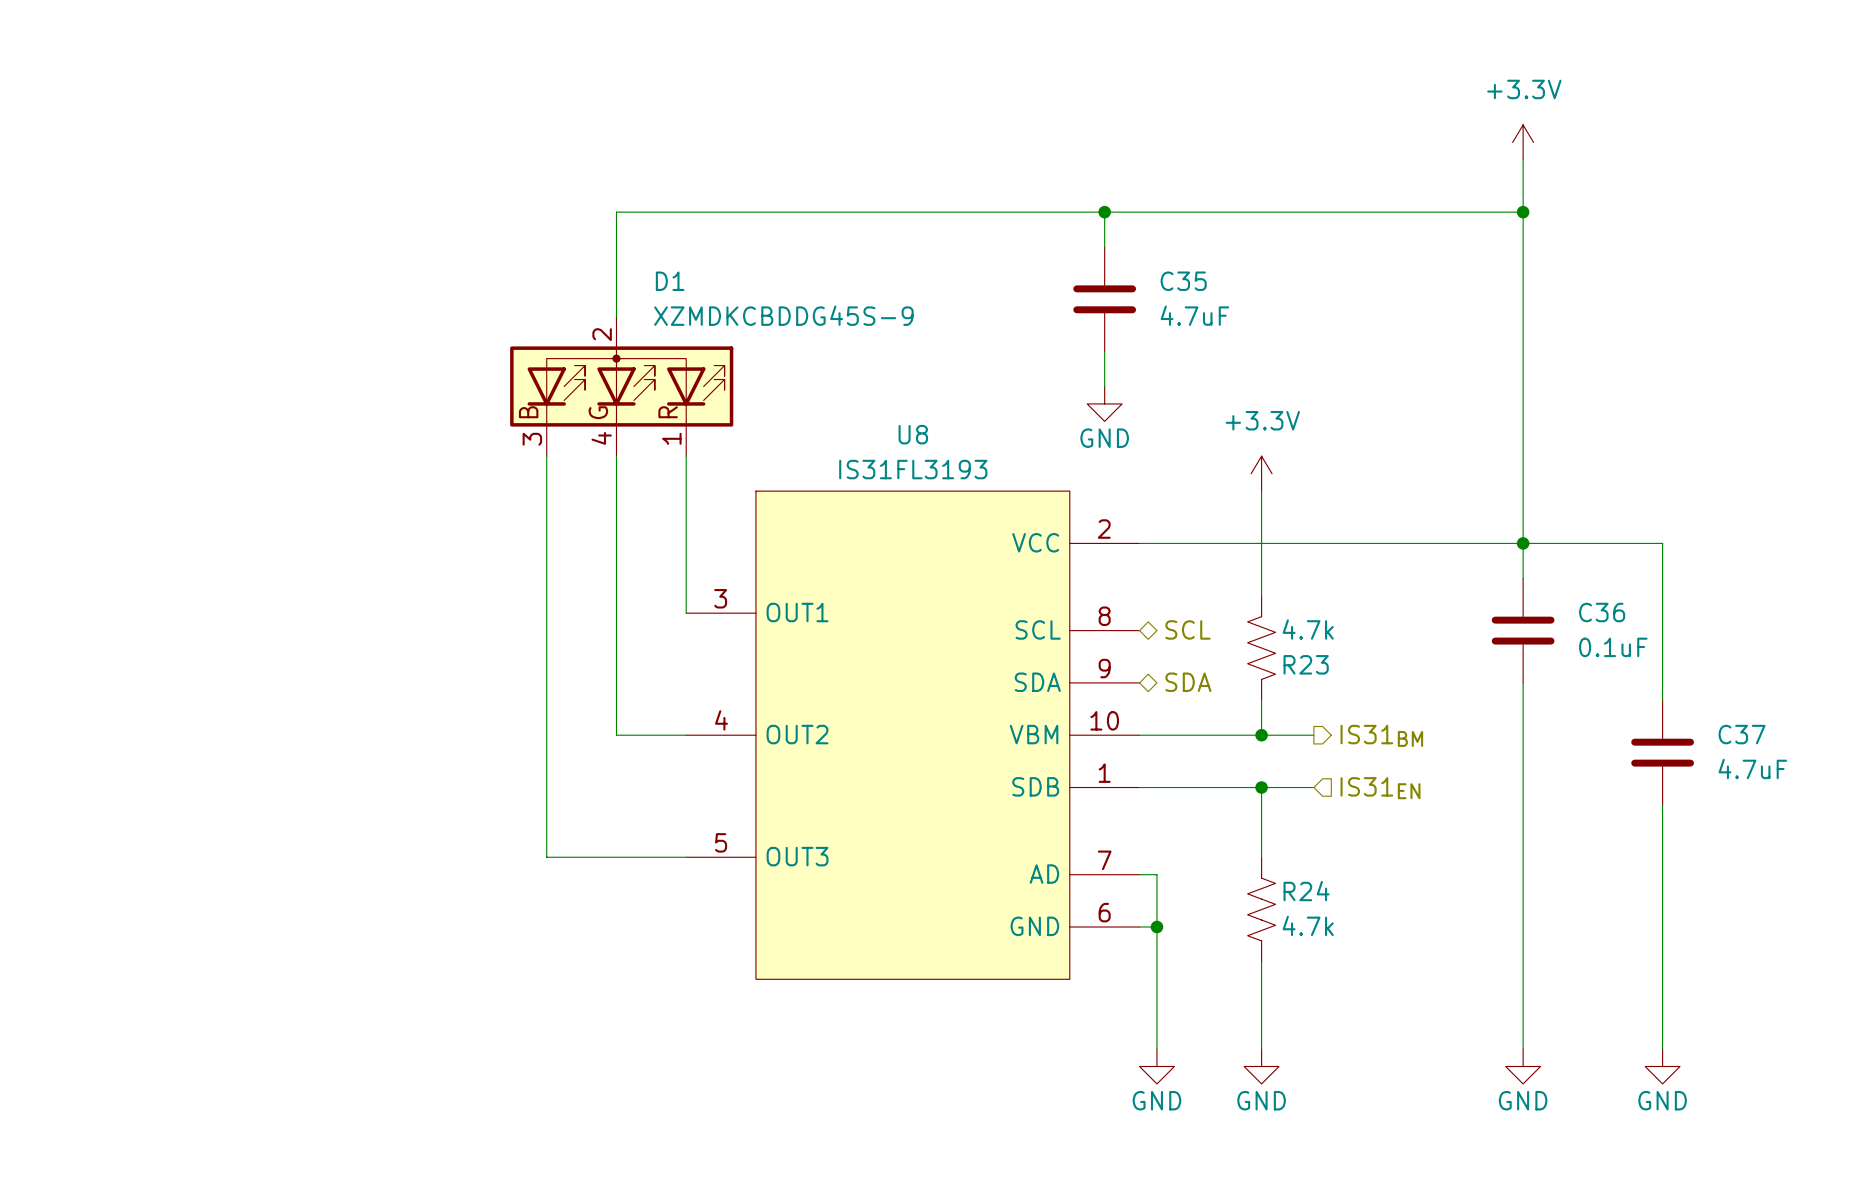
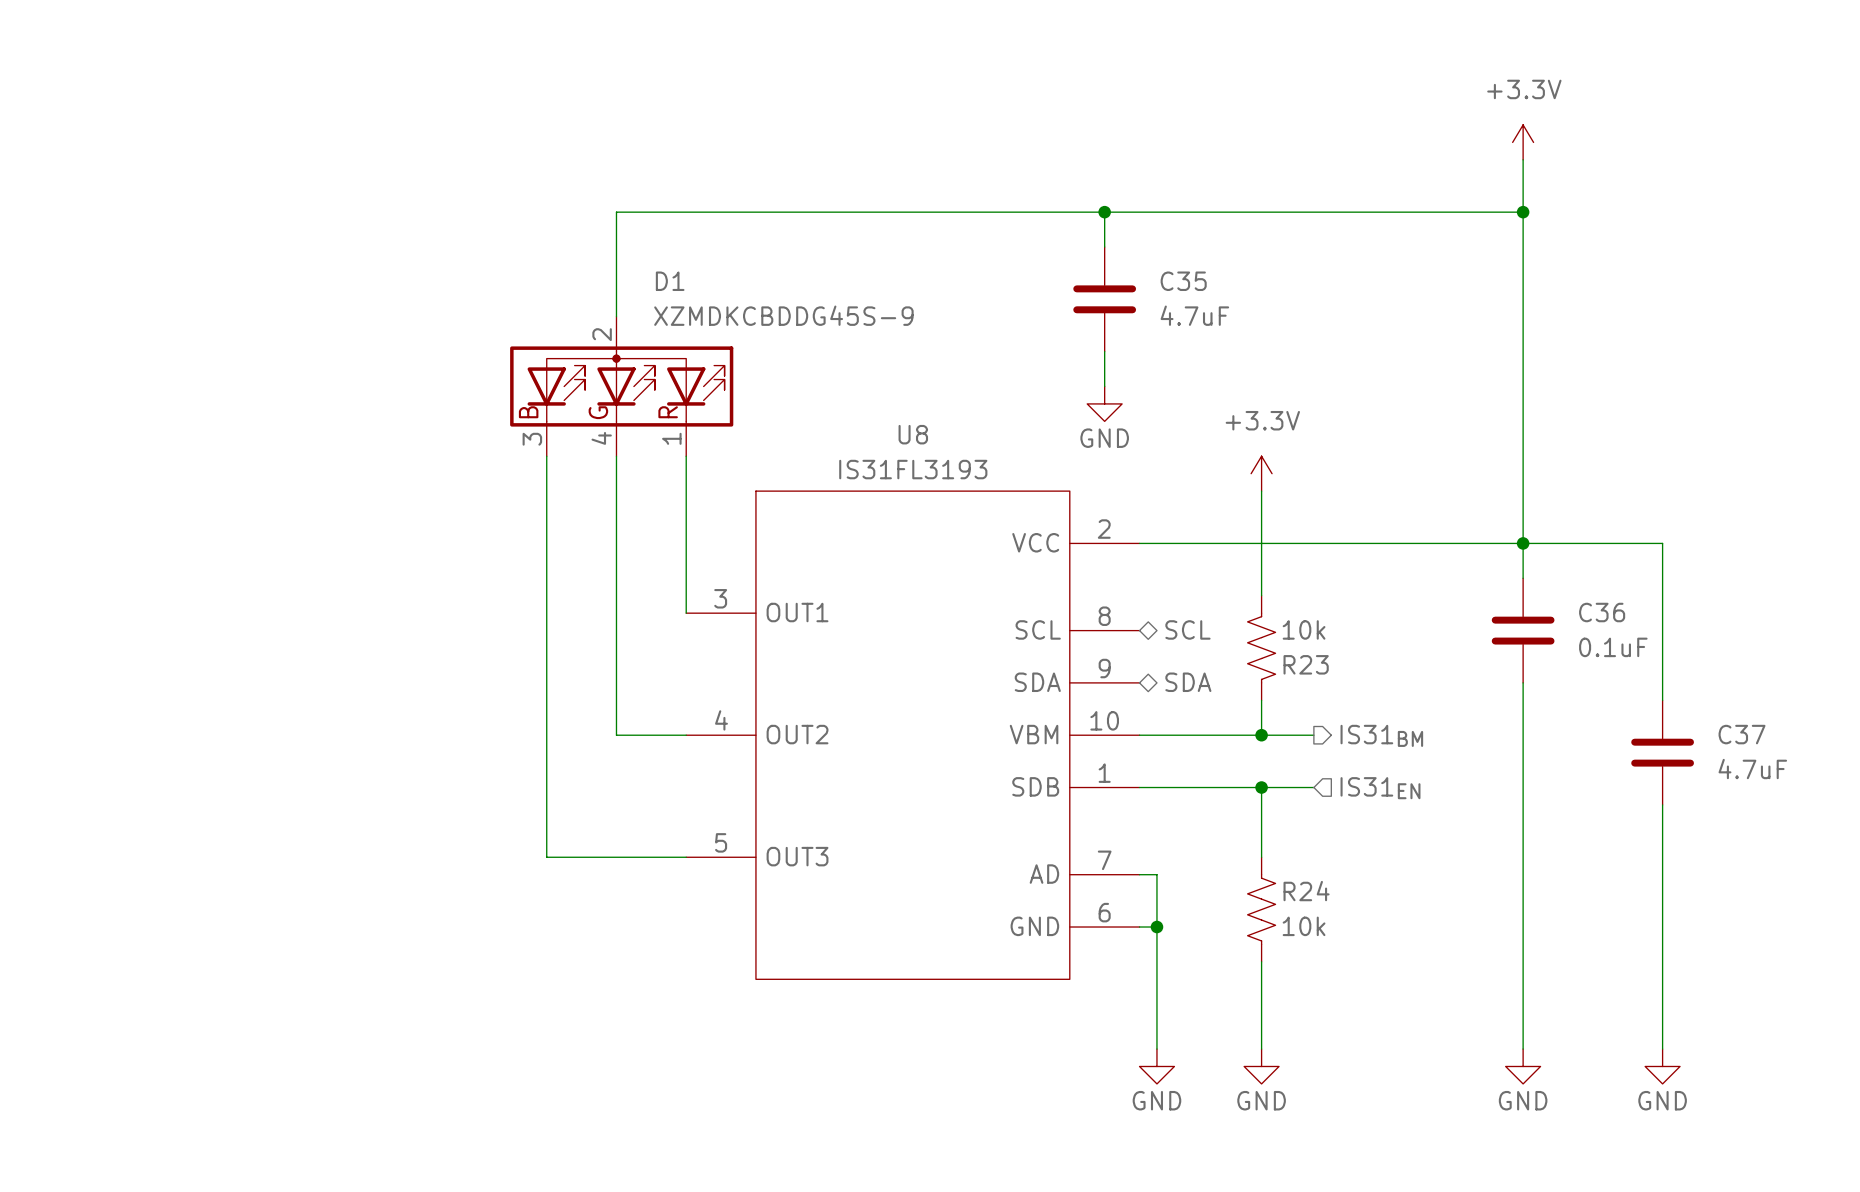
R23 value: 4.7k (1308, 629) -> 10k (1304, 629)
R24 value: 4.7k (1308, 925) -> 10k (1304, 926)

